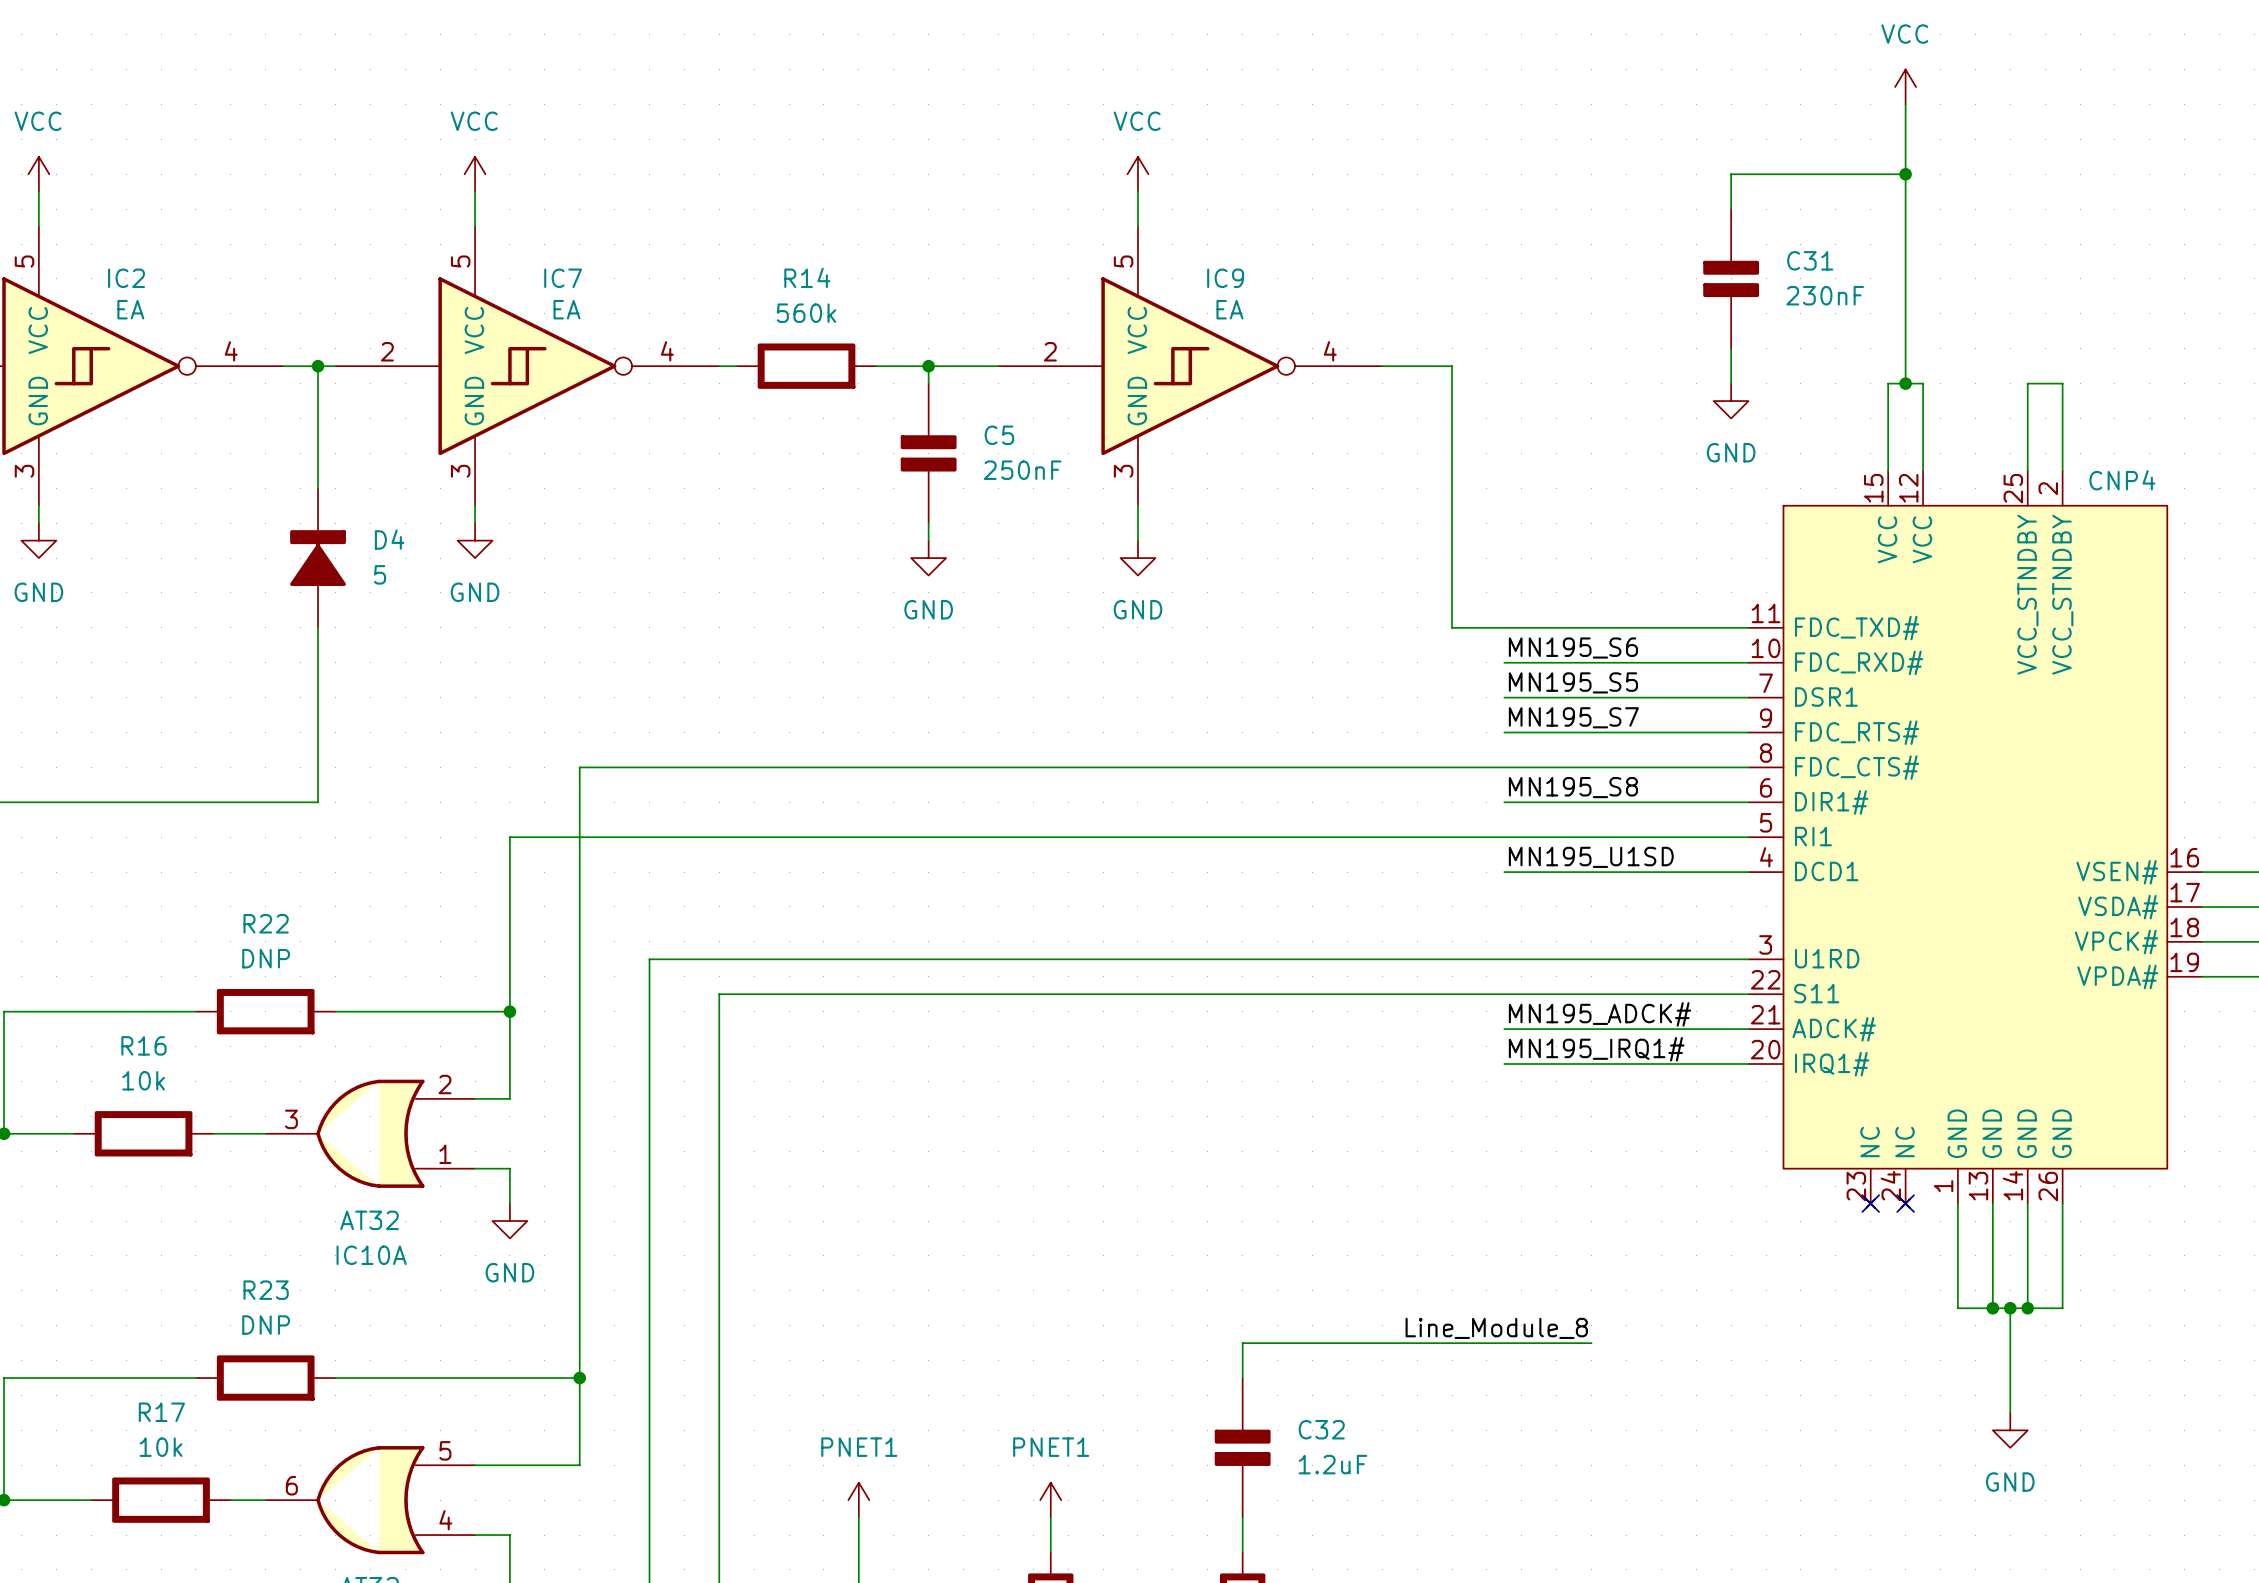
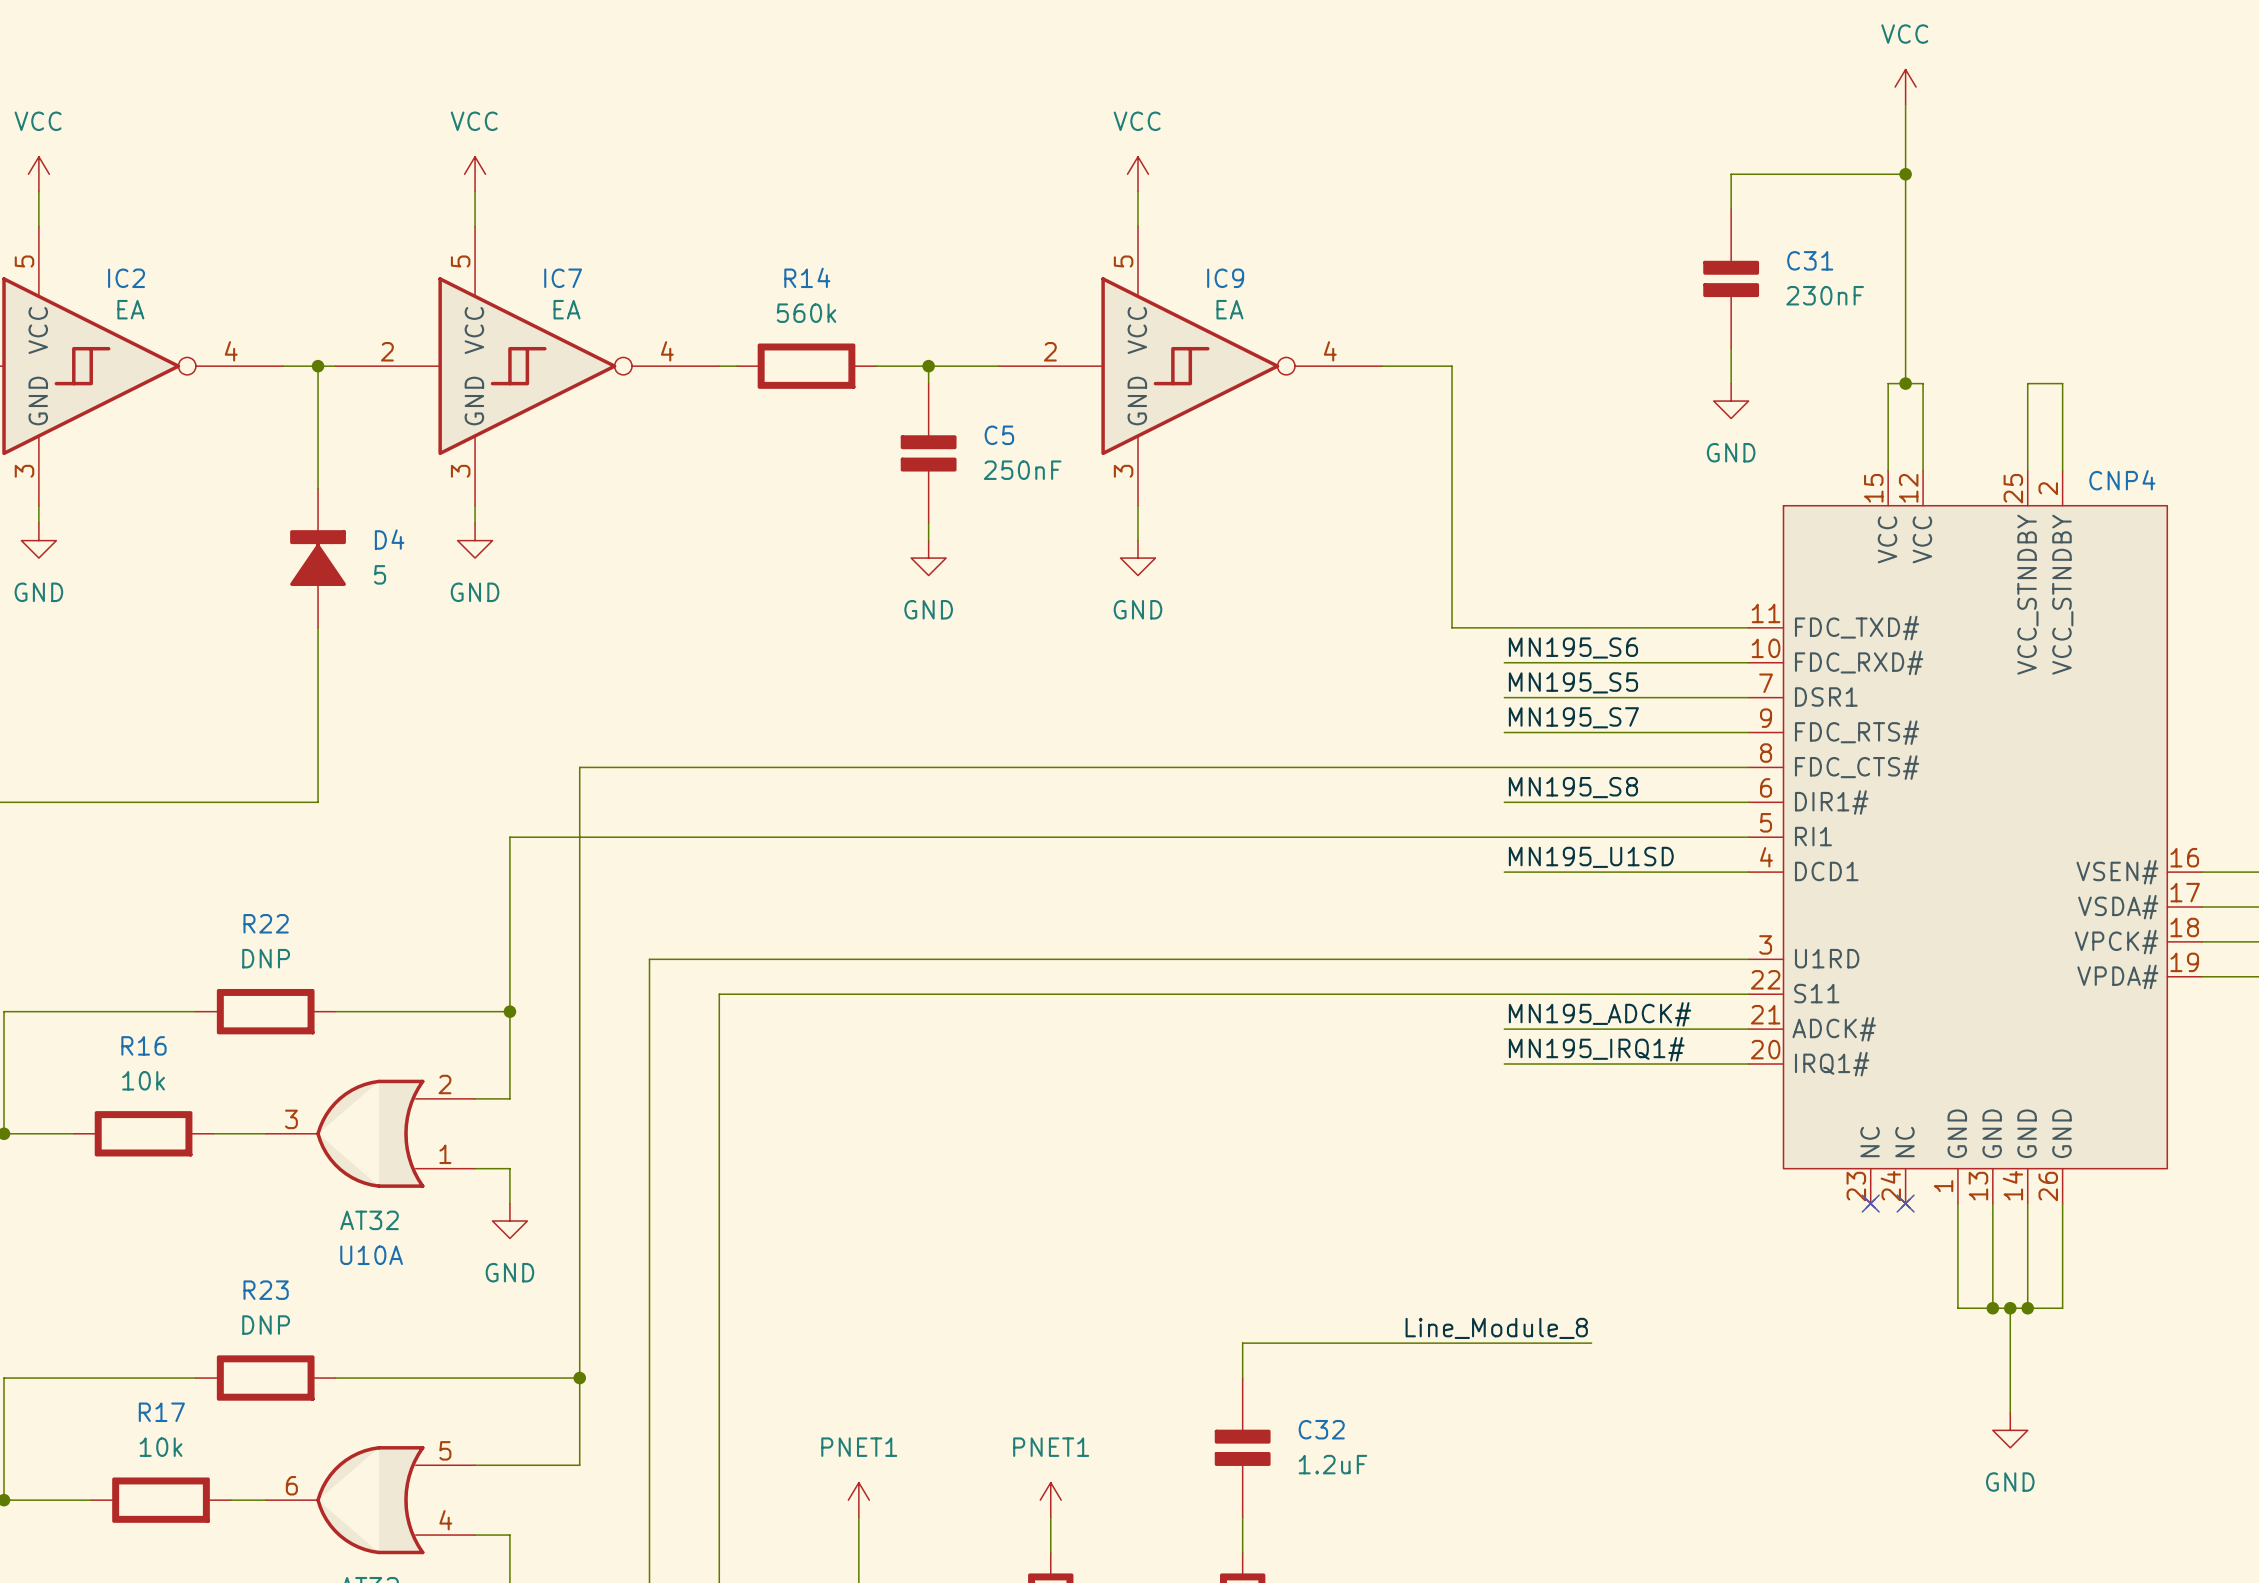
IC10A name: IC10A (371, 1255) -> U10A (371, 1255)

